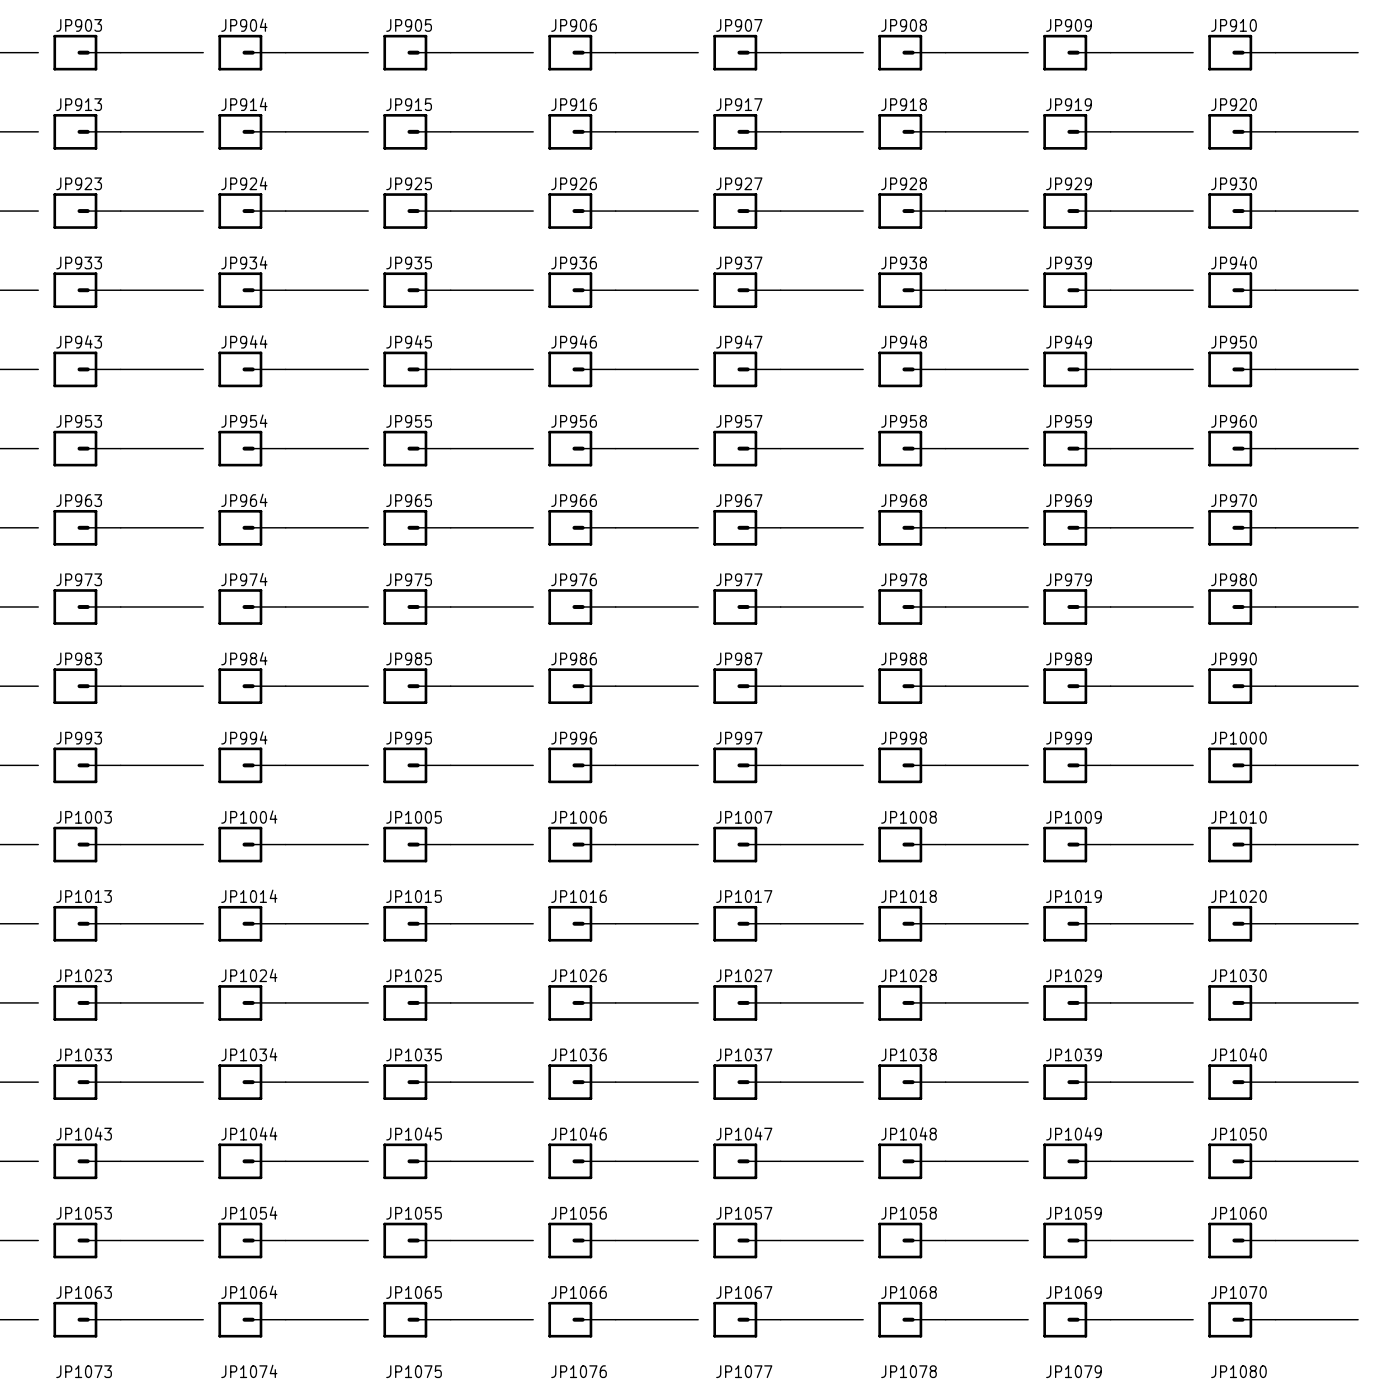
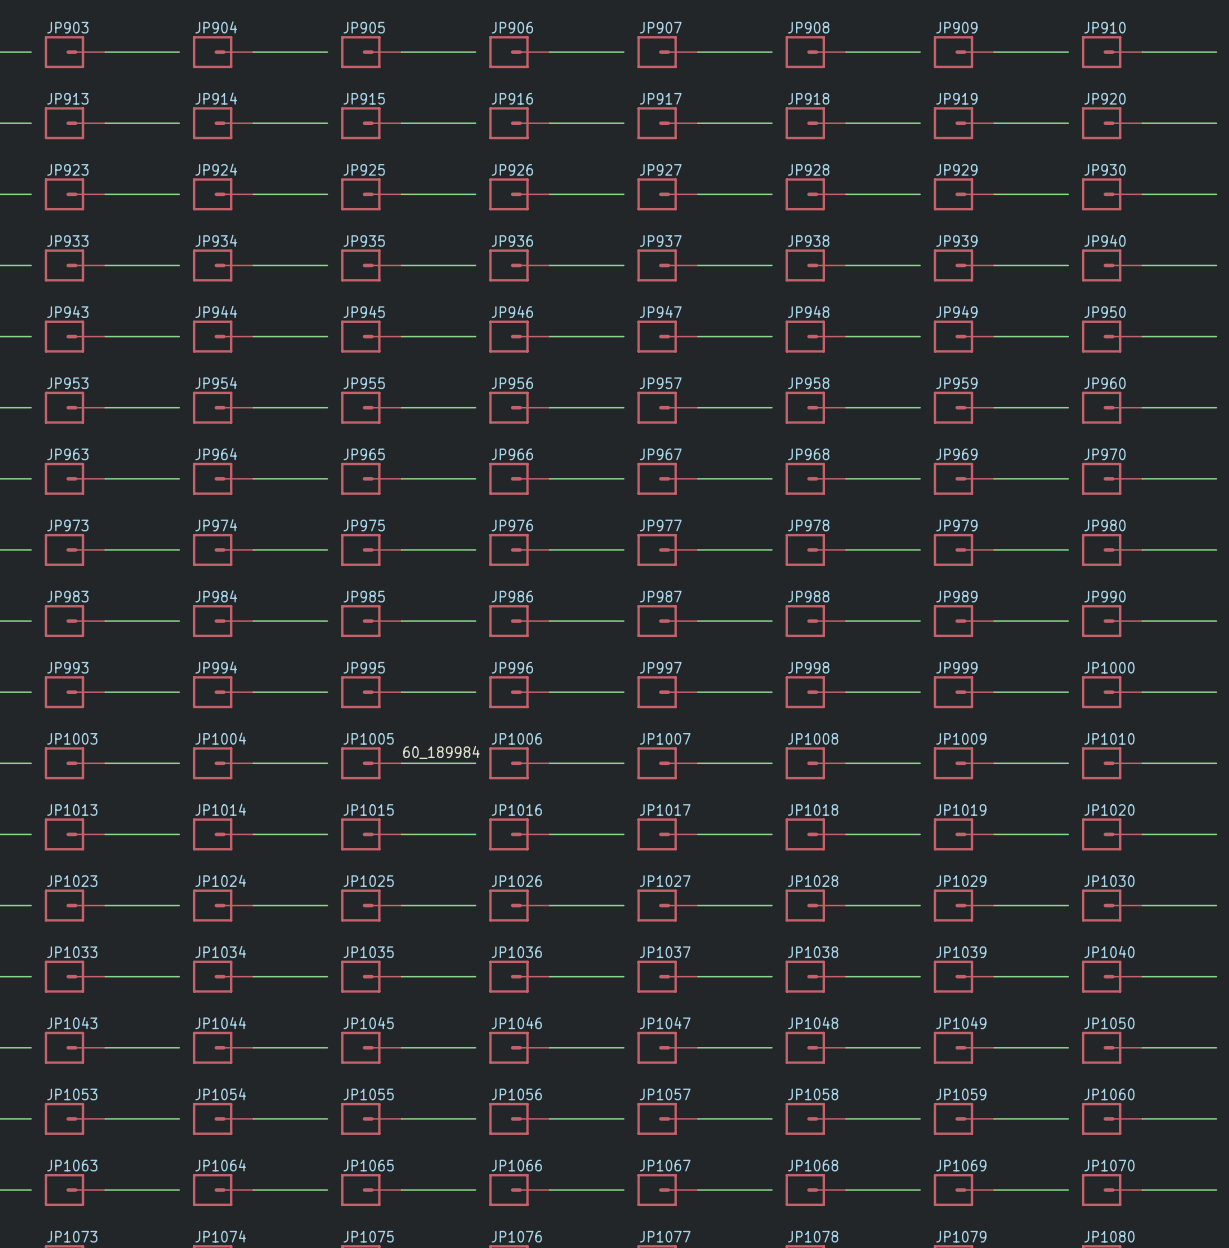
label: none -> 60_189984 (441, 752)

